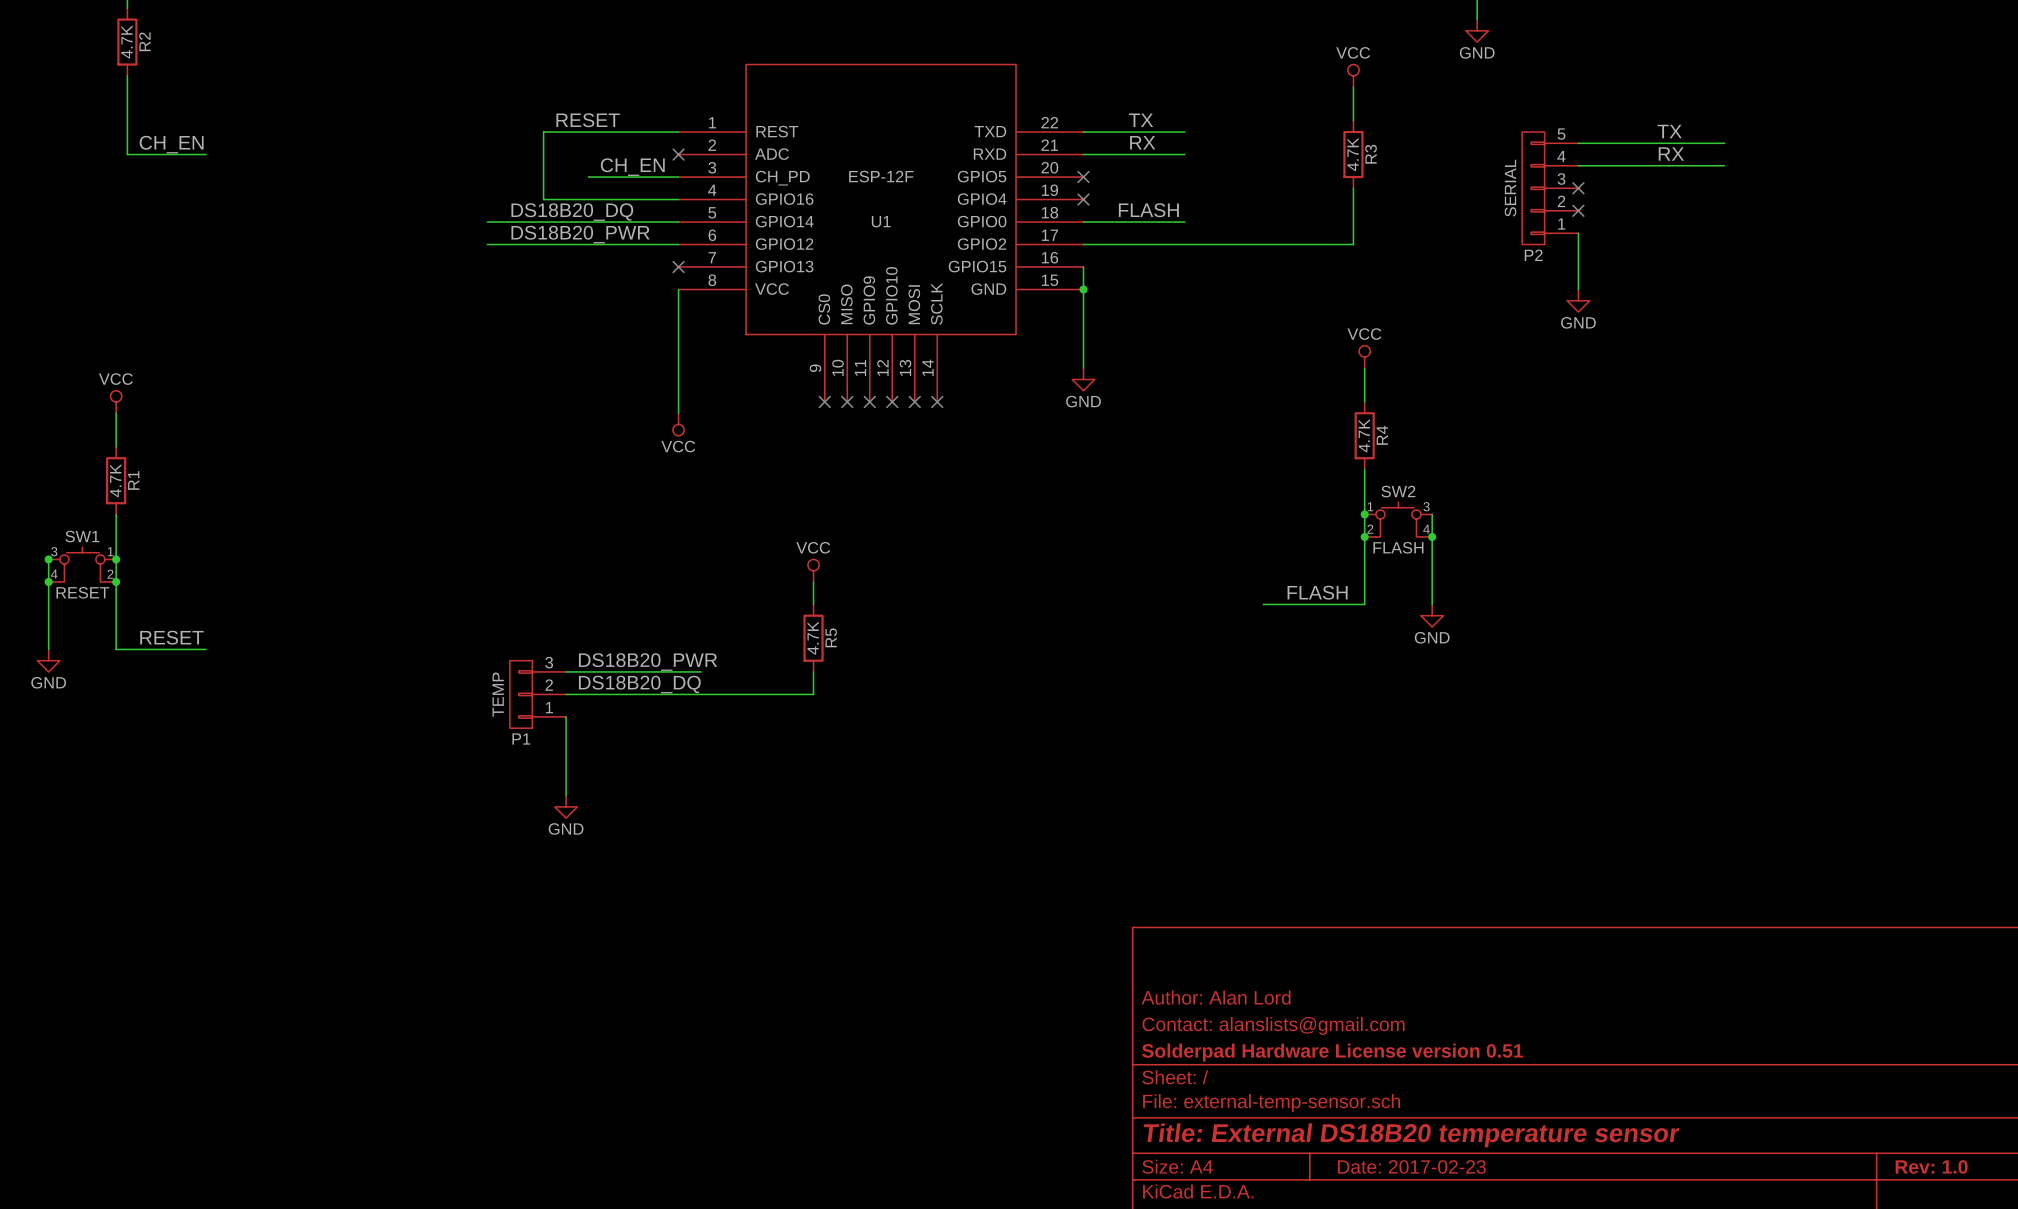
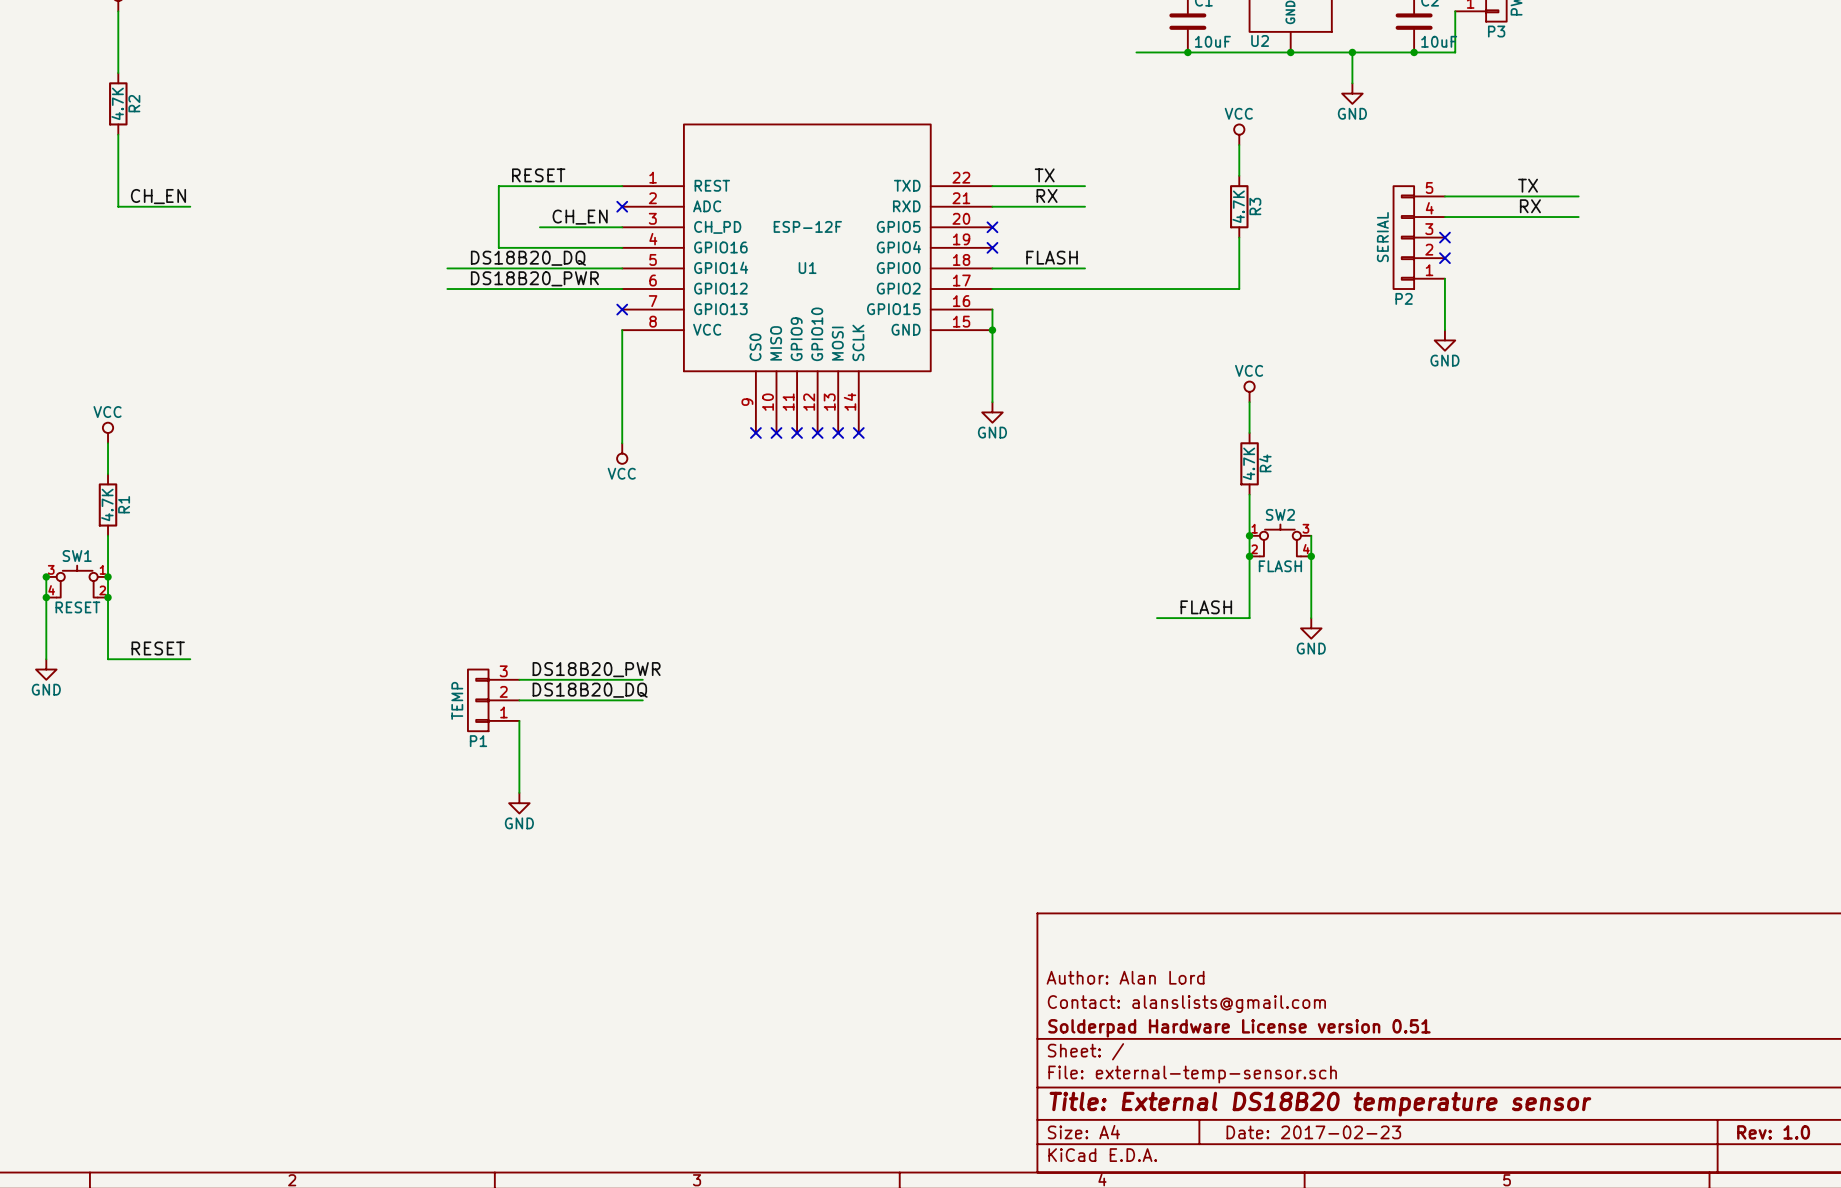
power symbol: VCC (813, 570) -> none
wire: (813, 581) (813, 604) -> none
R5: 4.7K (813, 638) -> none
wire: (813, 671) (813, 694) (701, 694) -> none

